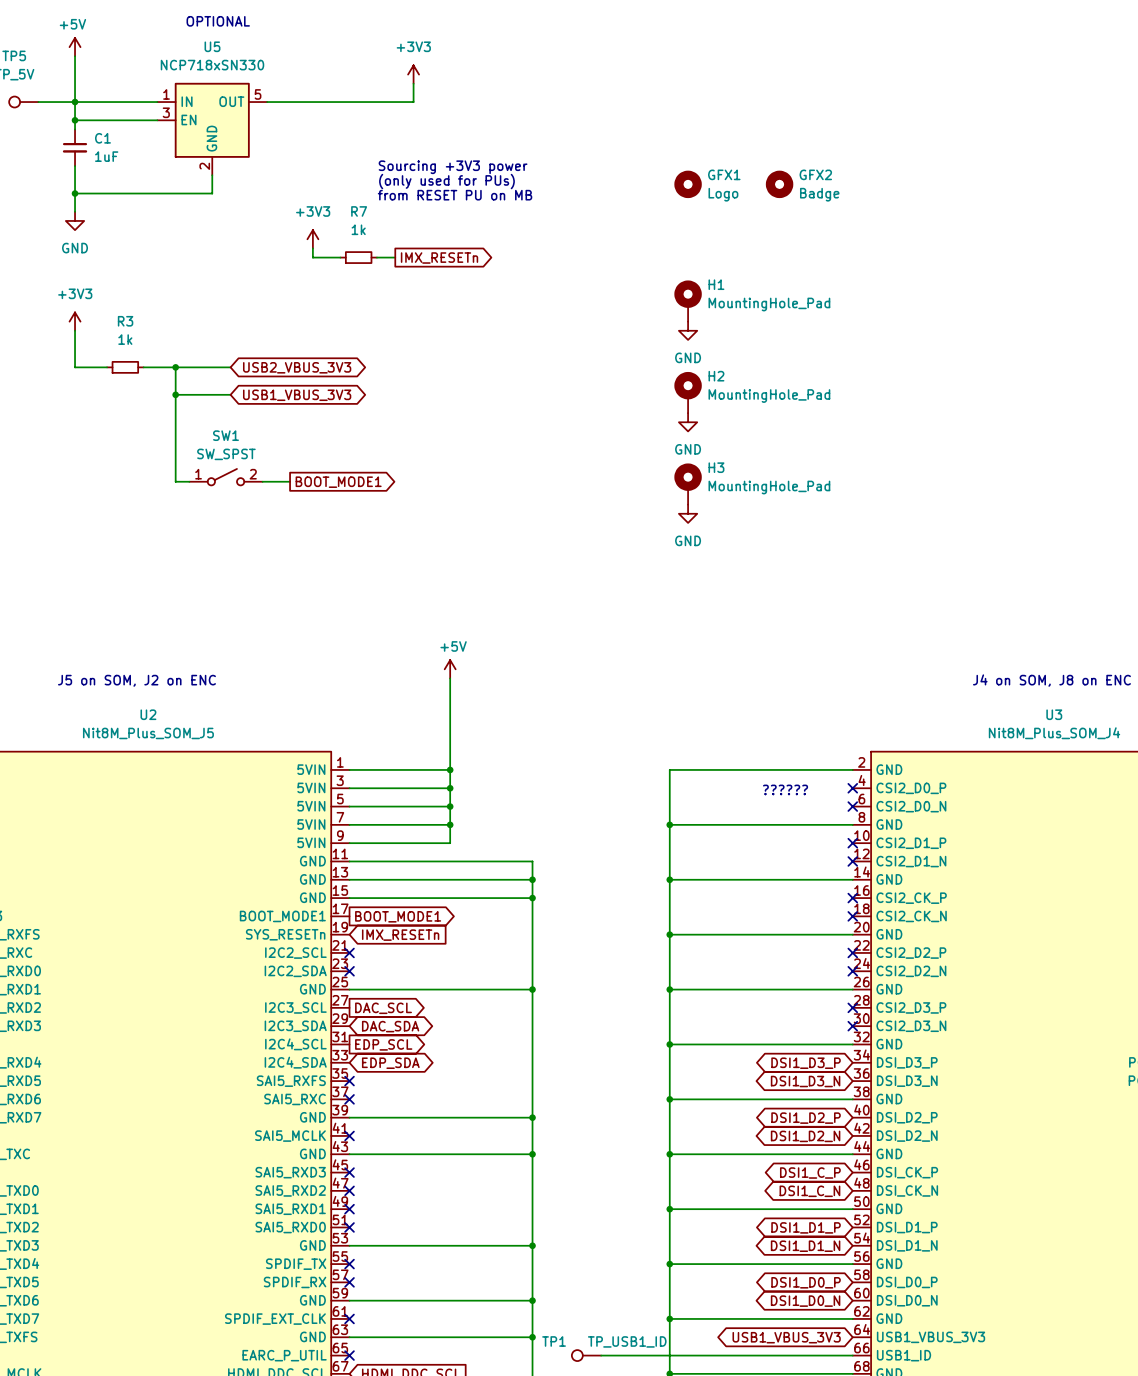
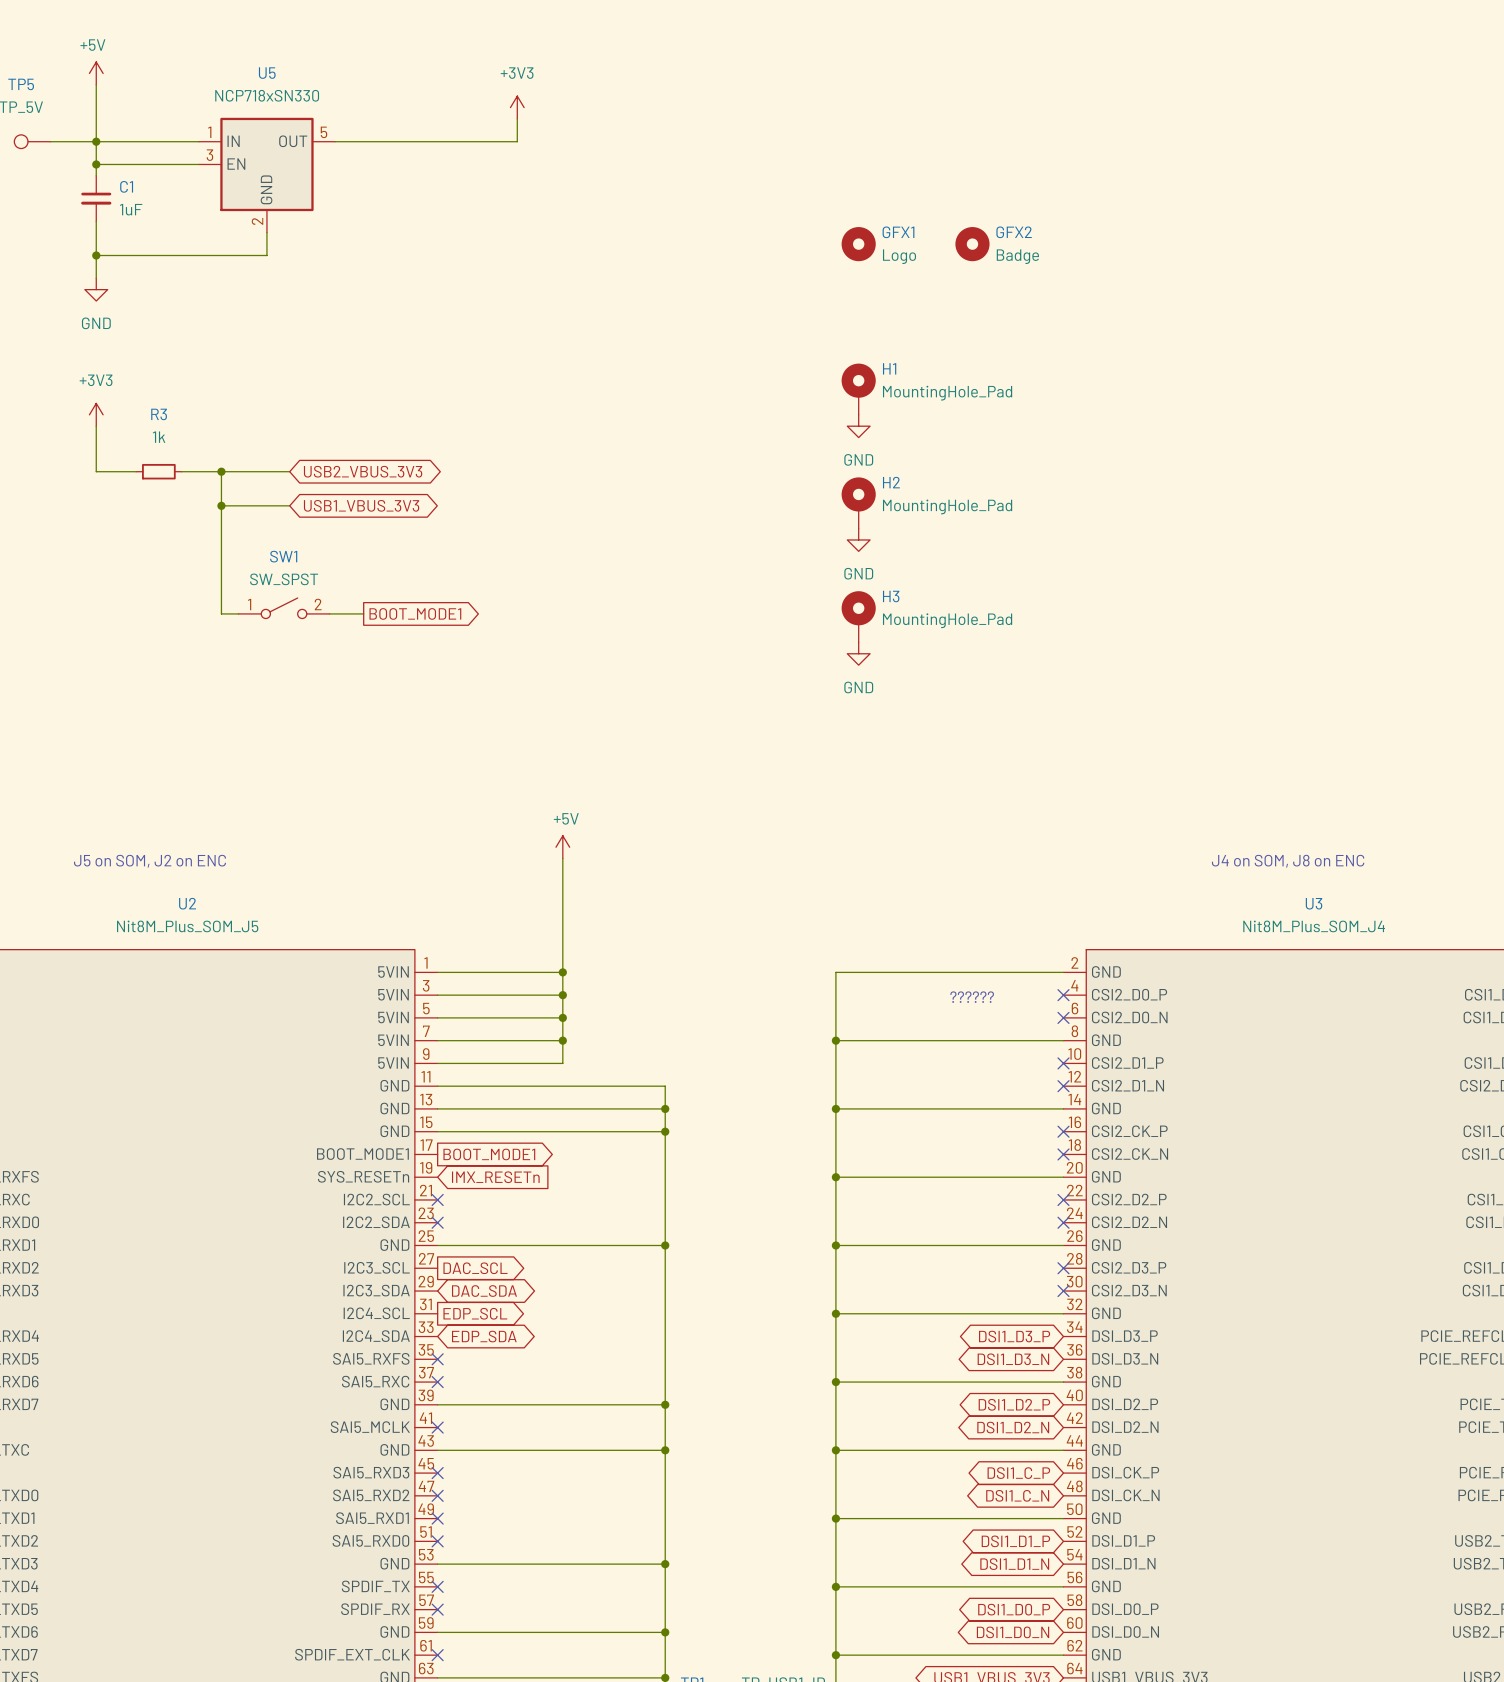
text: OPTIONAL (218, 21) -> none
text: Sourcing +3V3 power (453, 167) -> none
text: (only used for PUs) (446, 181) -> none
text: from RESET PU on MB (455, 195) -> none
power symbol: +3V3 (312, 239) -> none
wire: (312, 248) (312, 257) (340, 257) -> none
R7: 1k (358, 257) -> none
wire: (376, 257) (395, 257) -> none
global label: IMX_RESETn (439, 258) -> none

